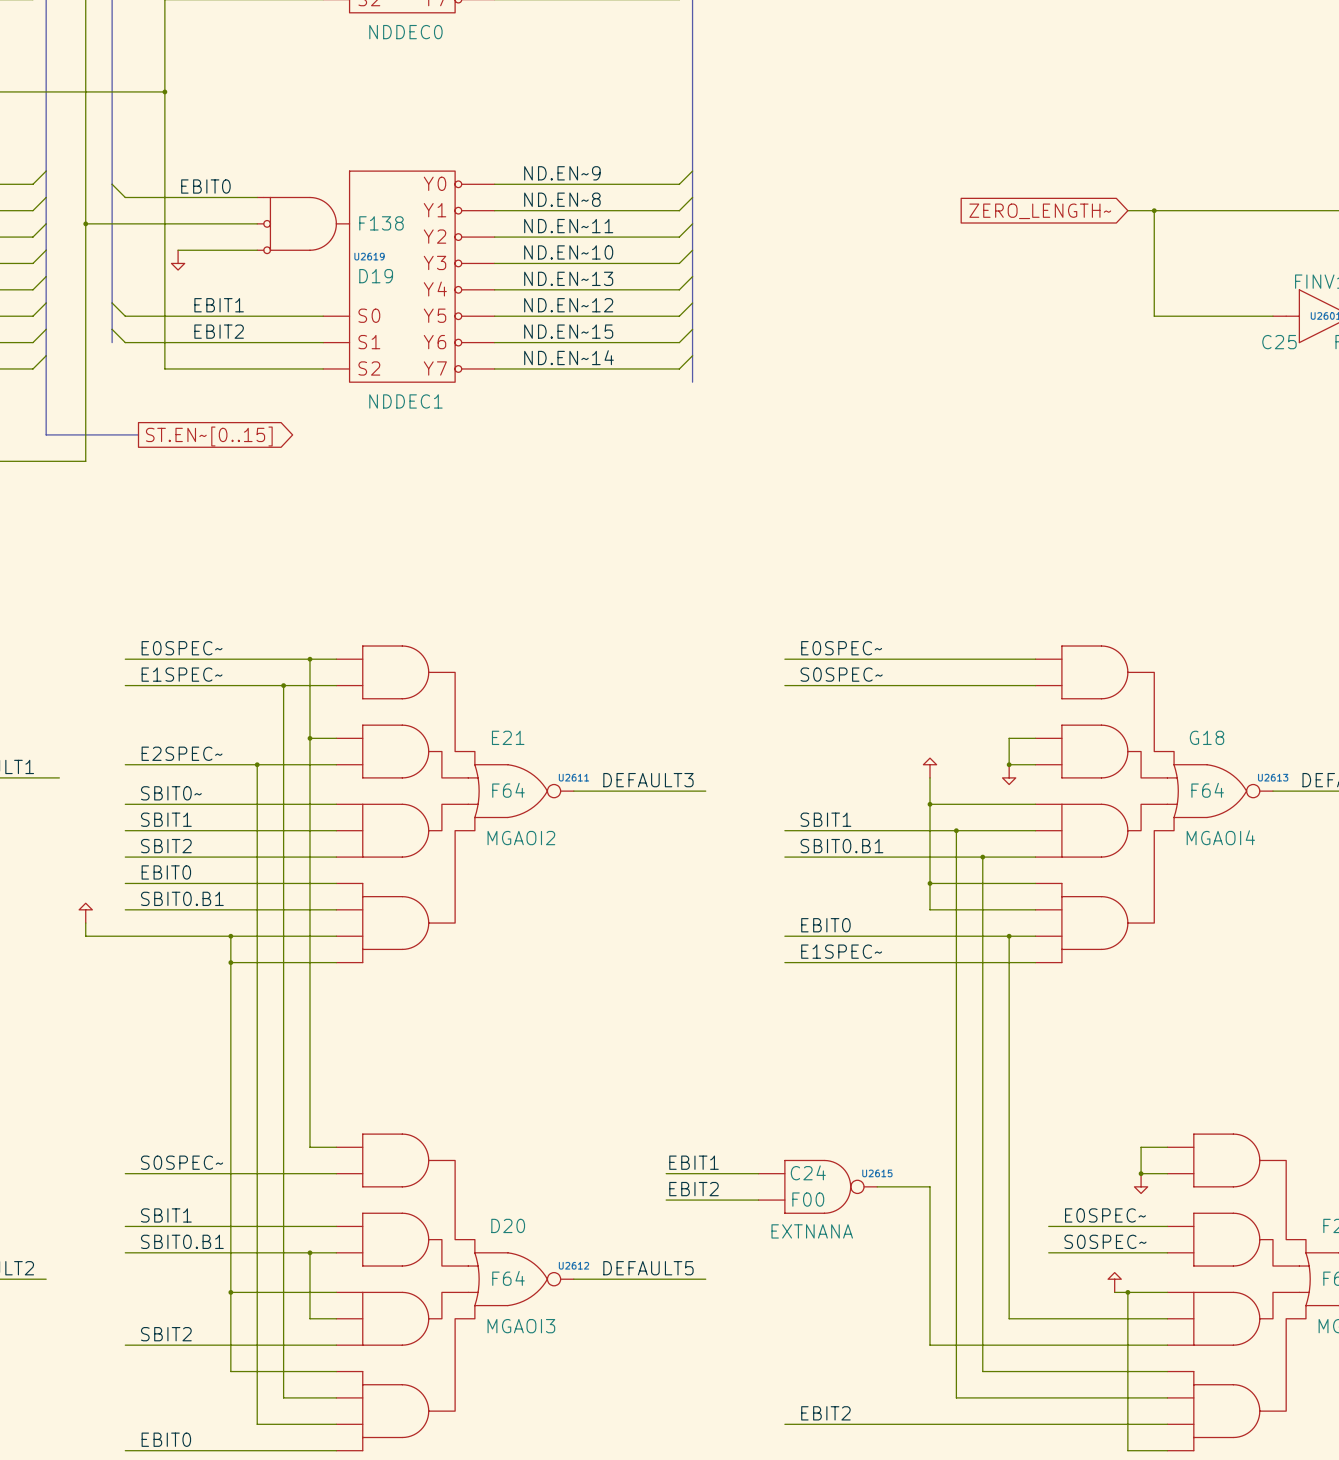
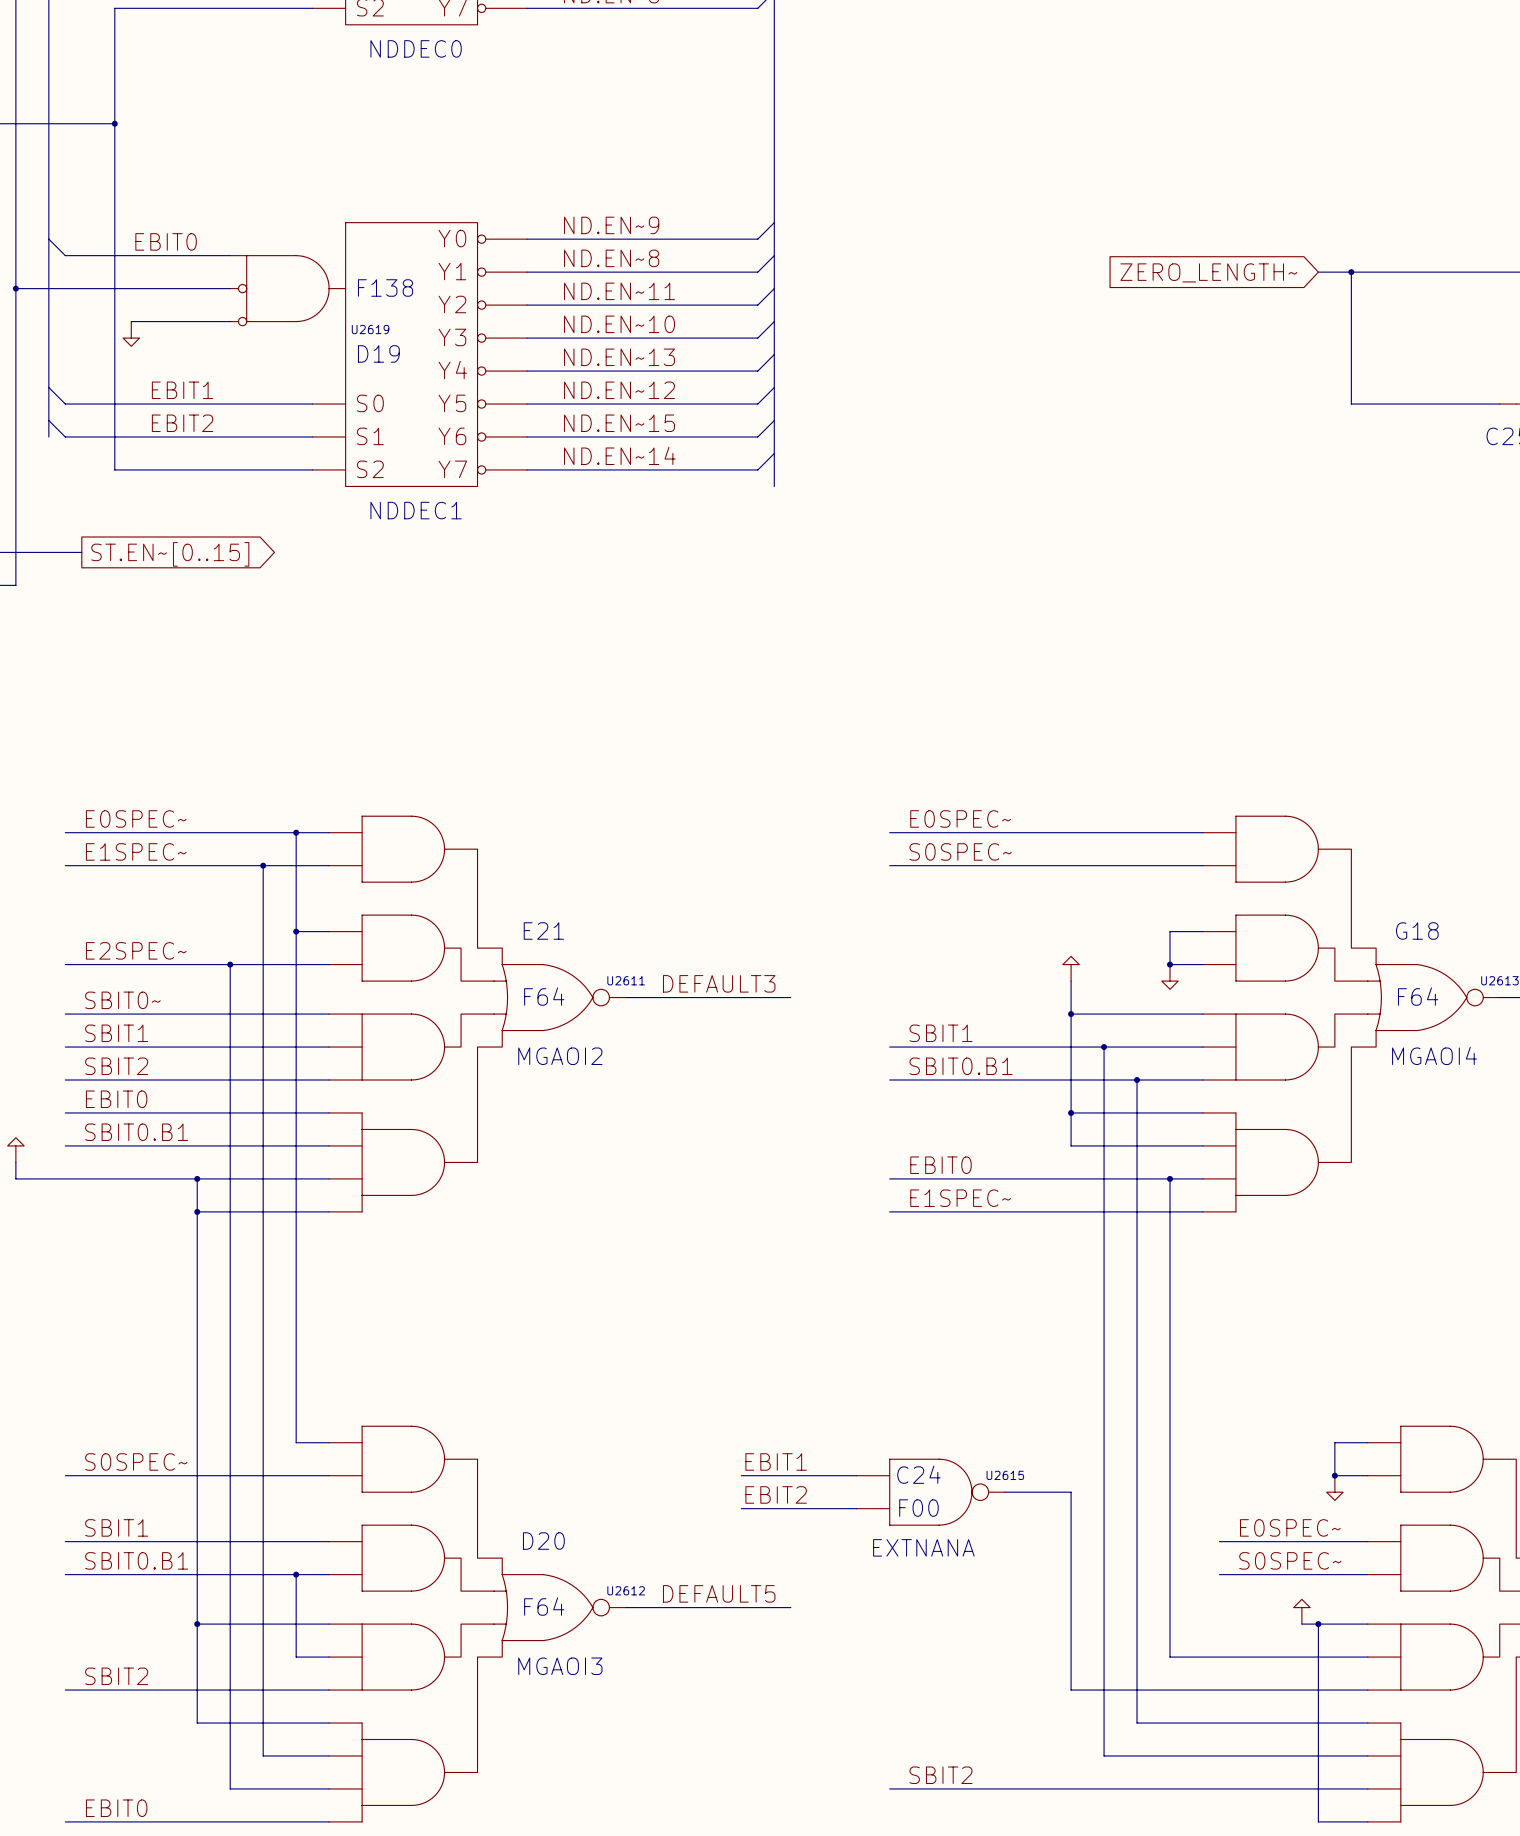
label: EBIT2 (825, 1413) -> SBIT2 (941, 1775)

